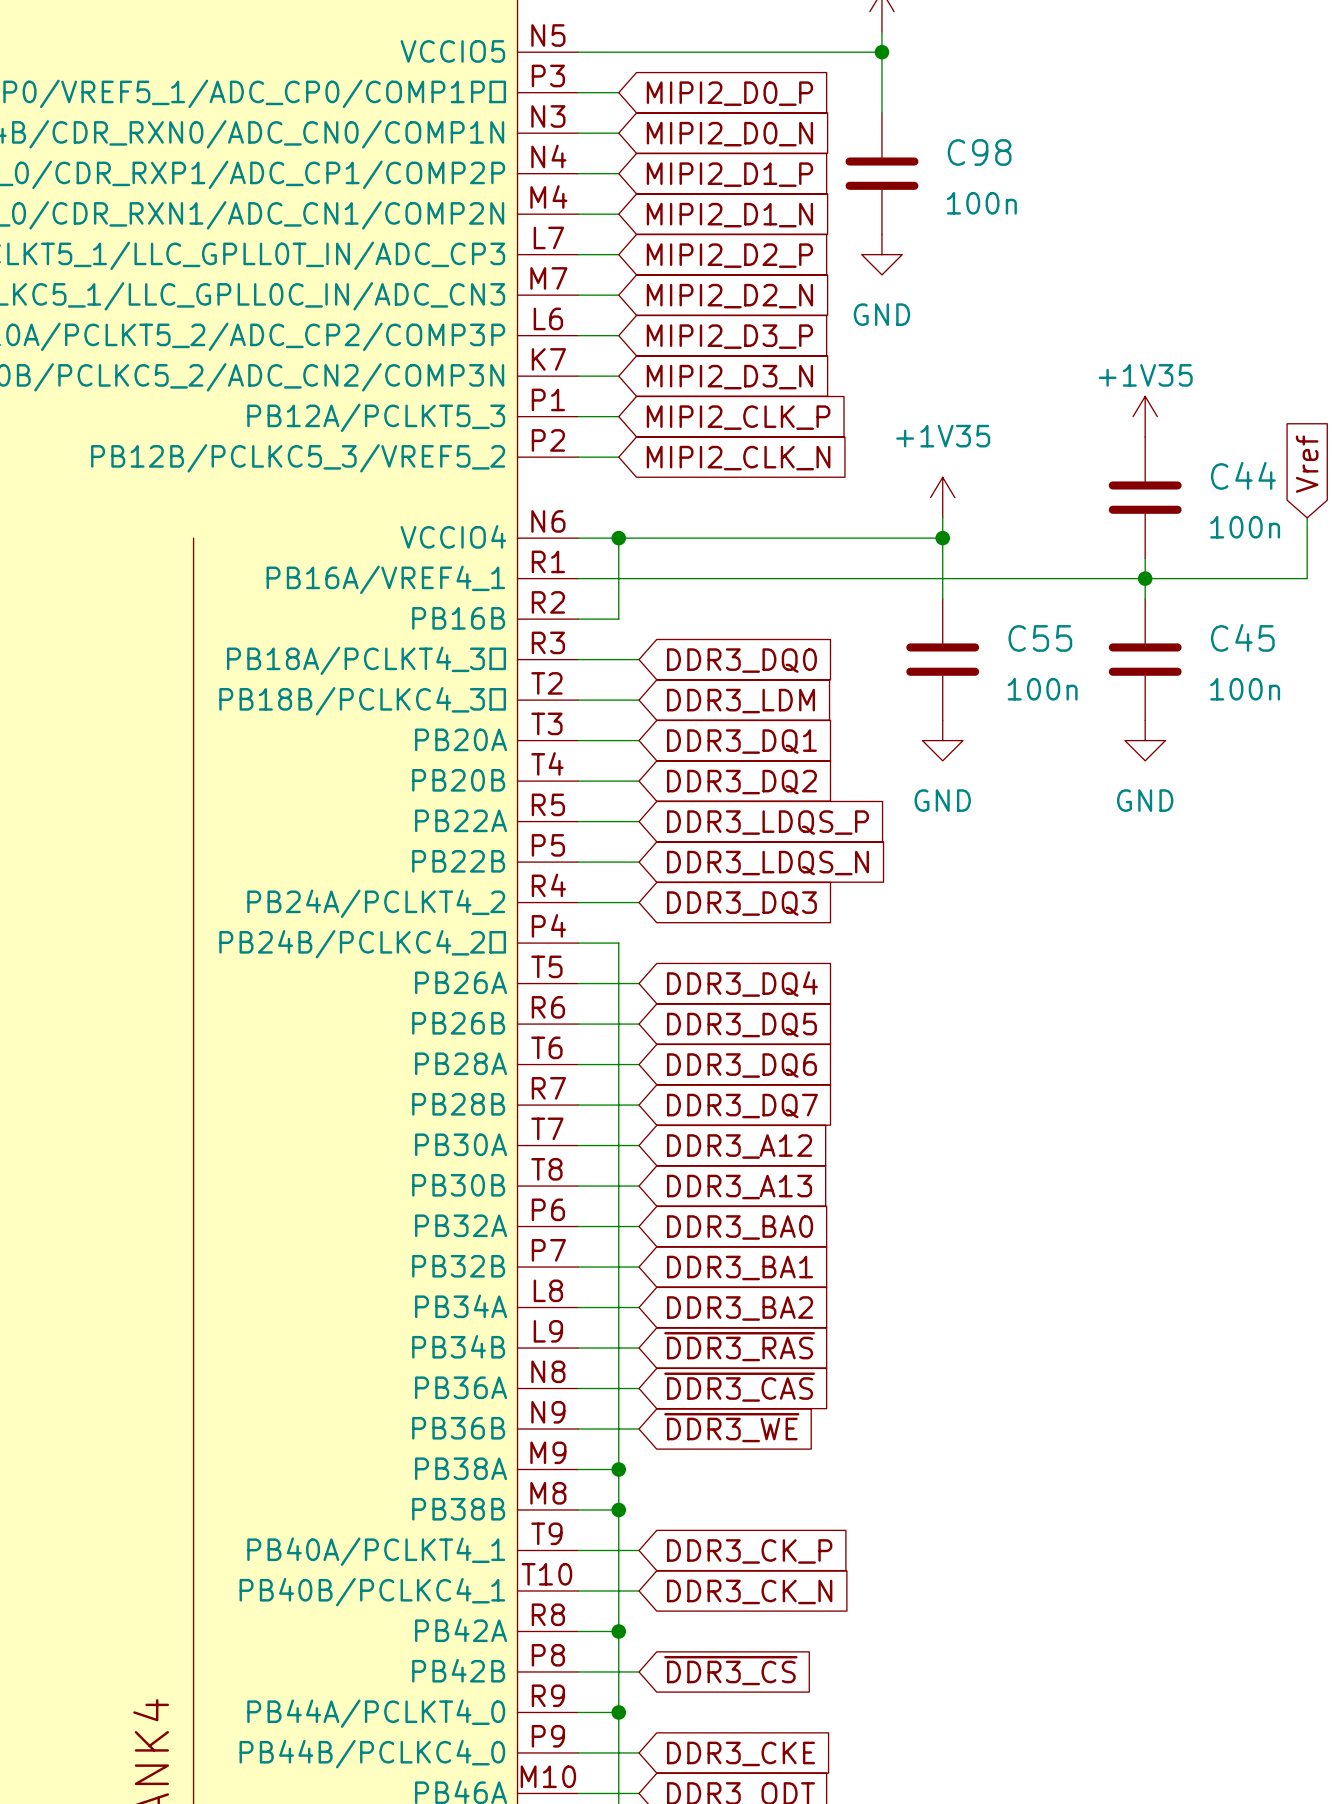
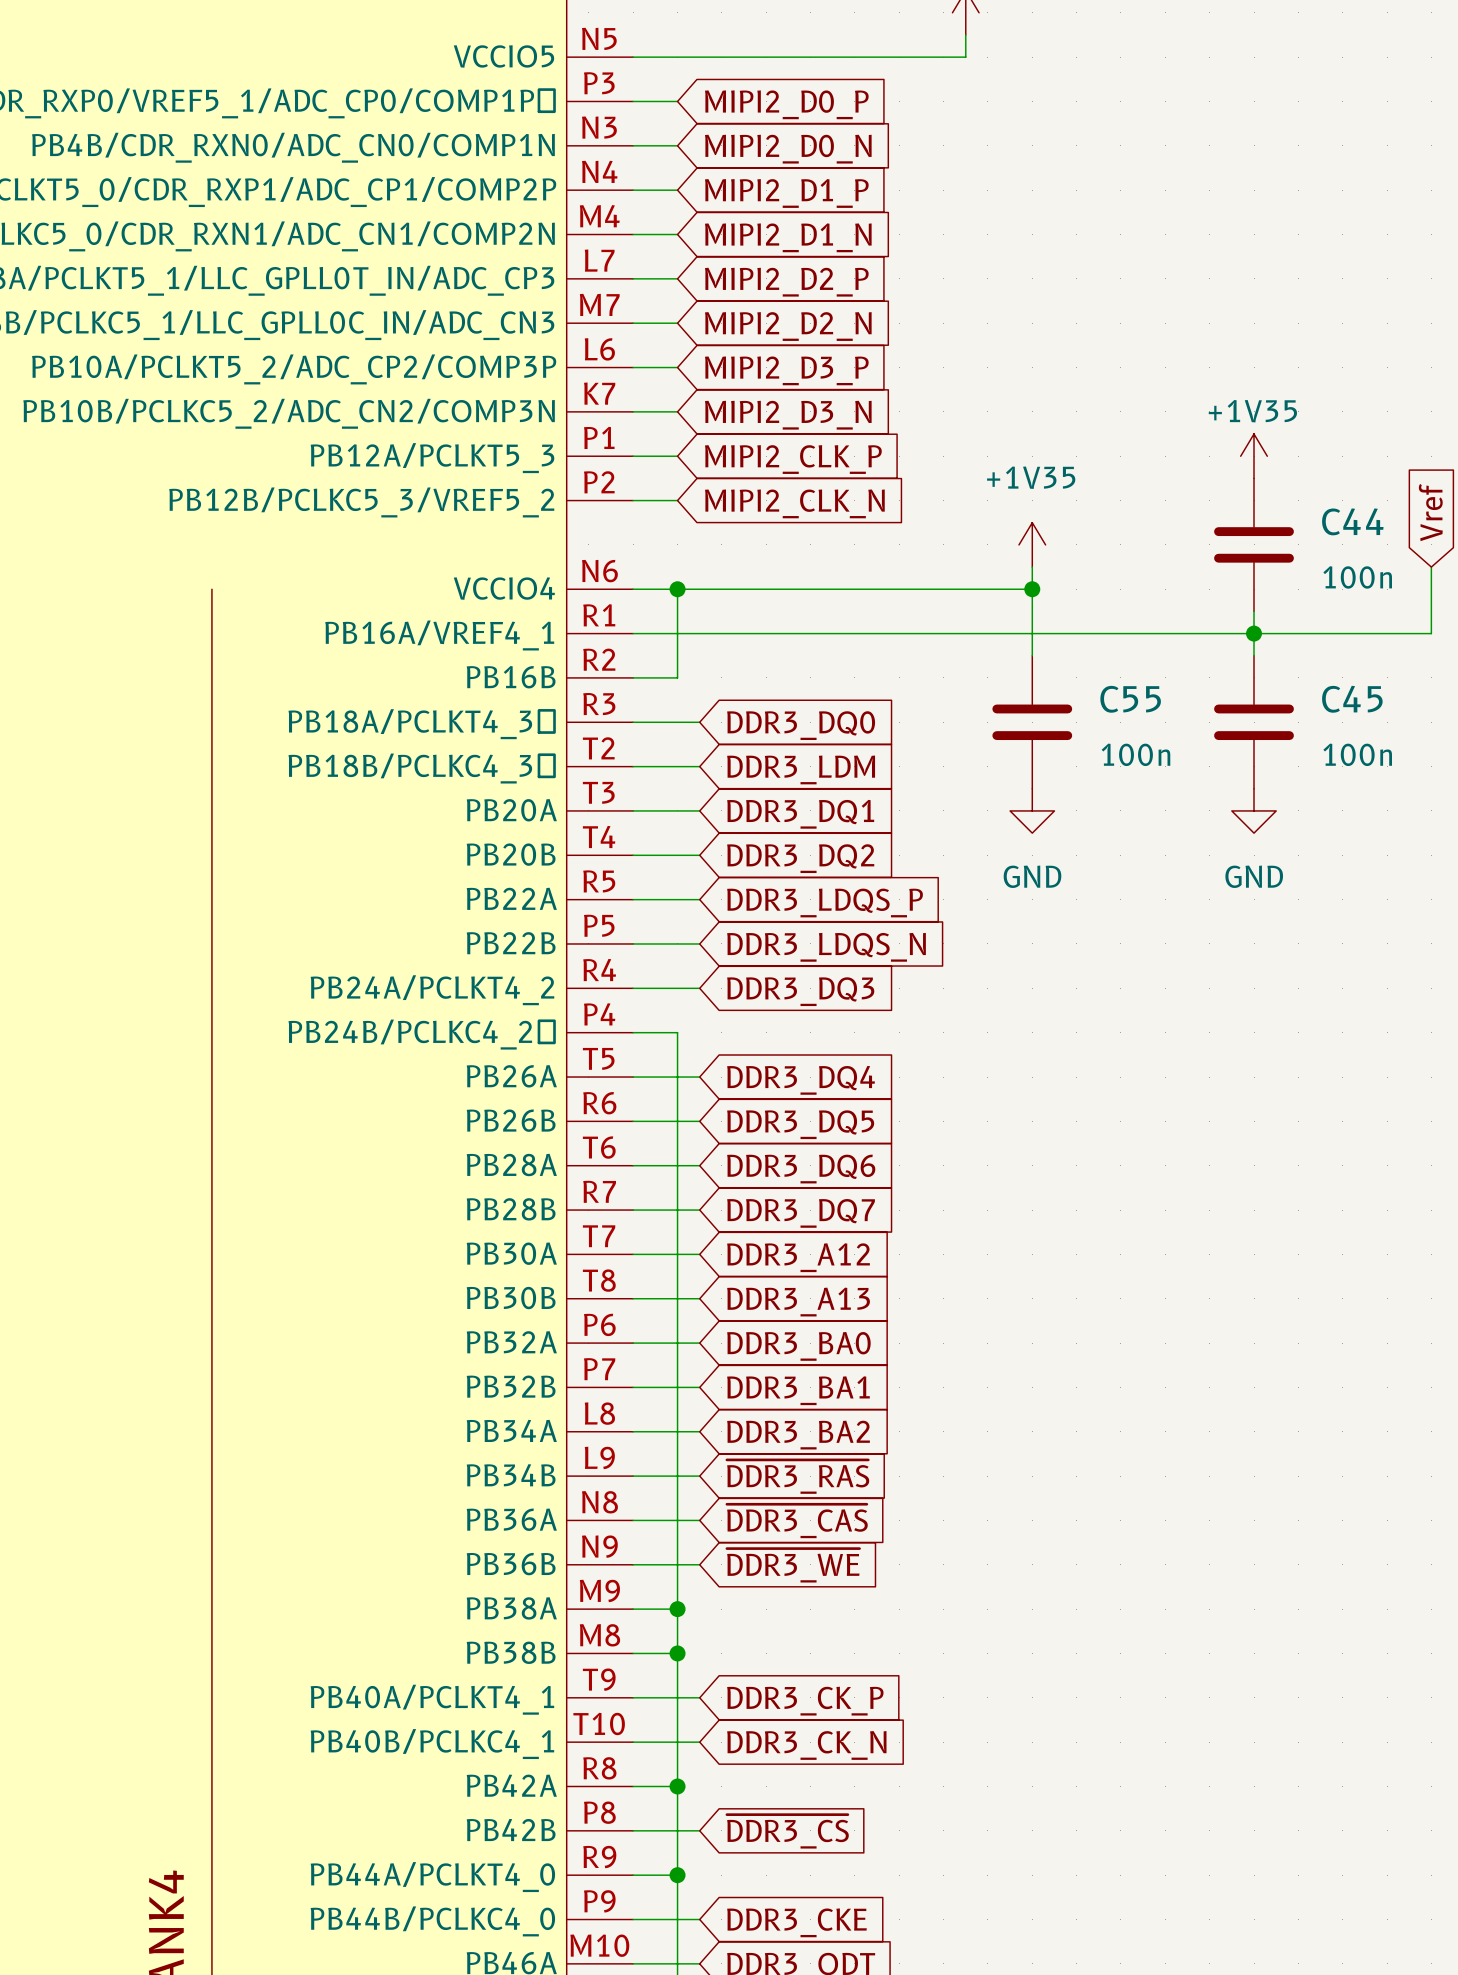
wire: (881, 52) (881, 112) -> none
junction: (881, 52) -> none
C98: (881, 173) -> none
power symbol: GND (881, 254) -> none

